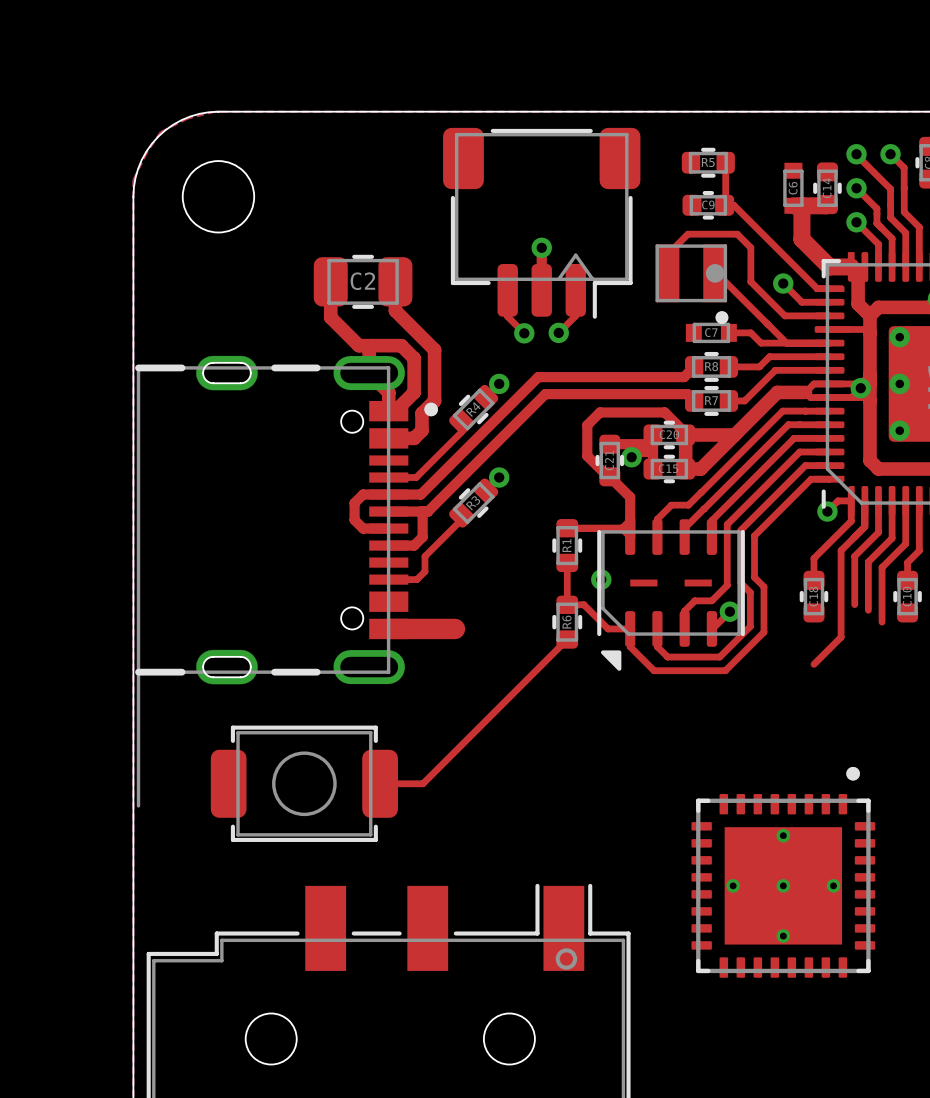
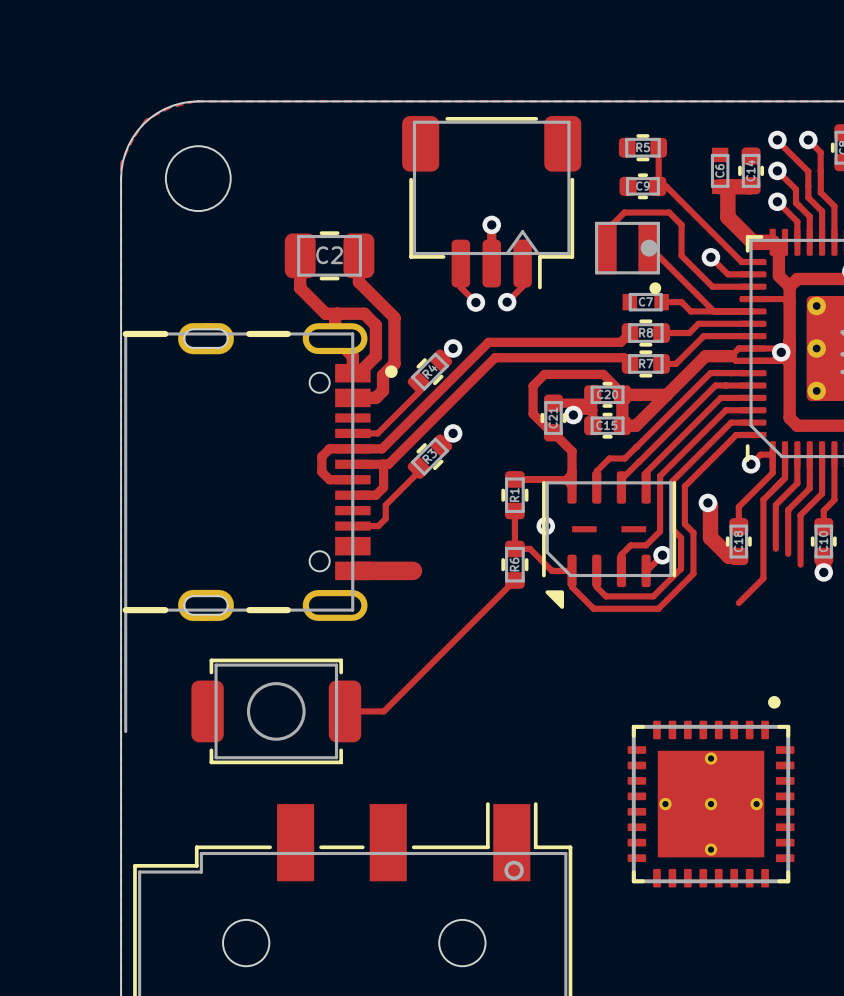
top track: none -> (707, 502) (710, 505) (710, 537) (729, 556) (738, 556)
via: none -> (707, 502)
via: none -> (823, 572)

